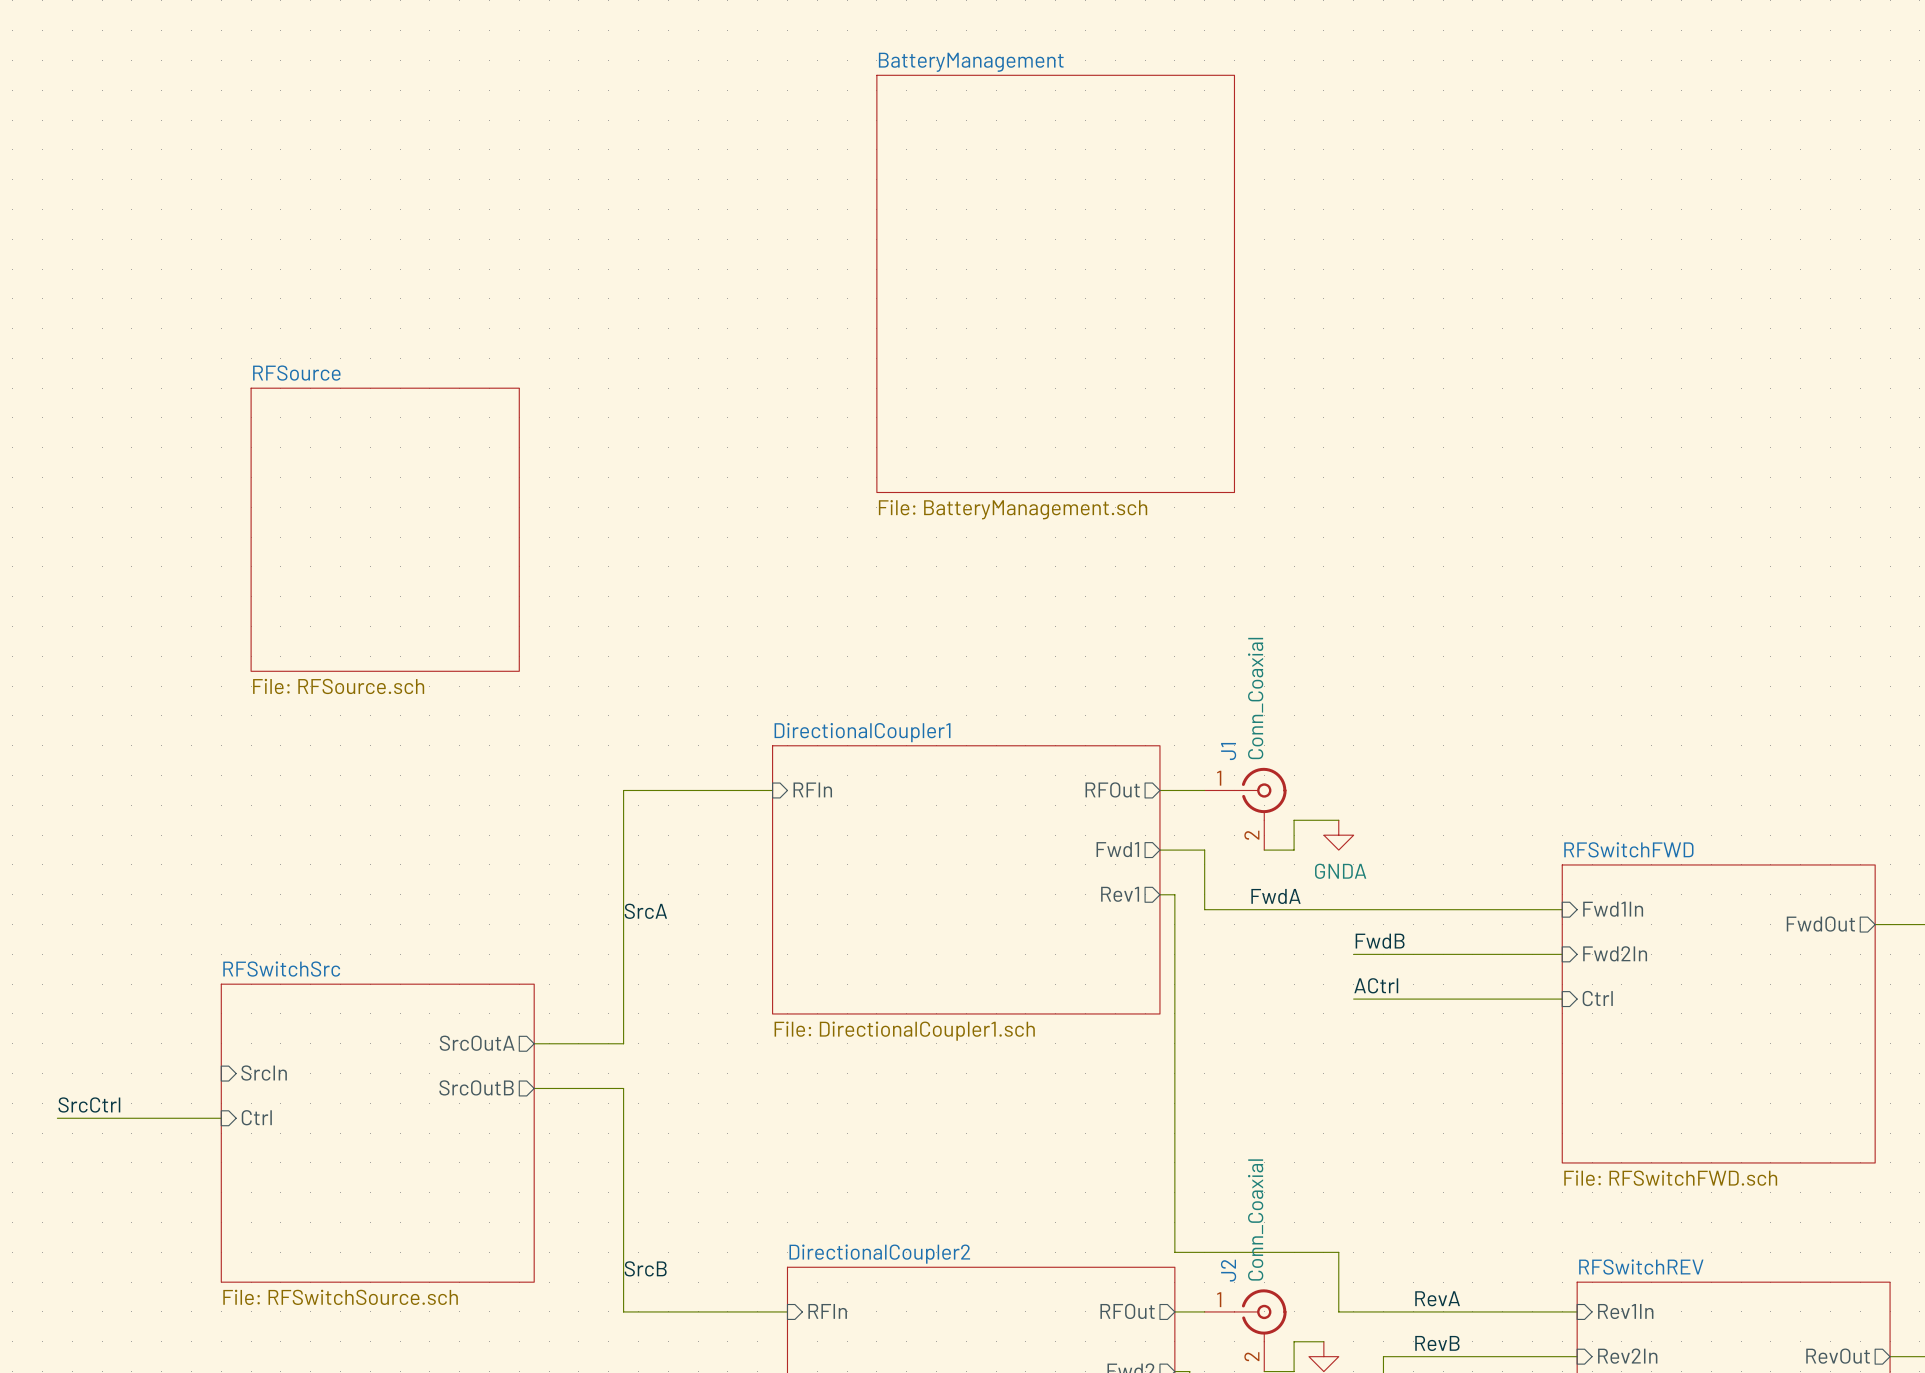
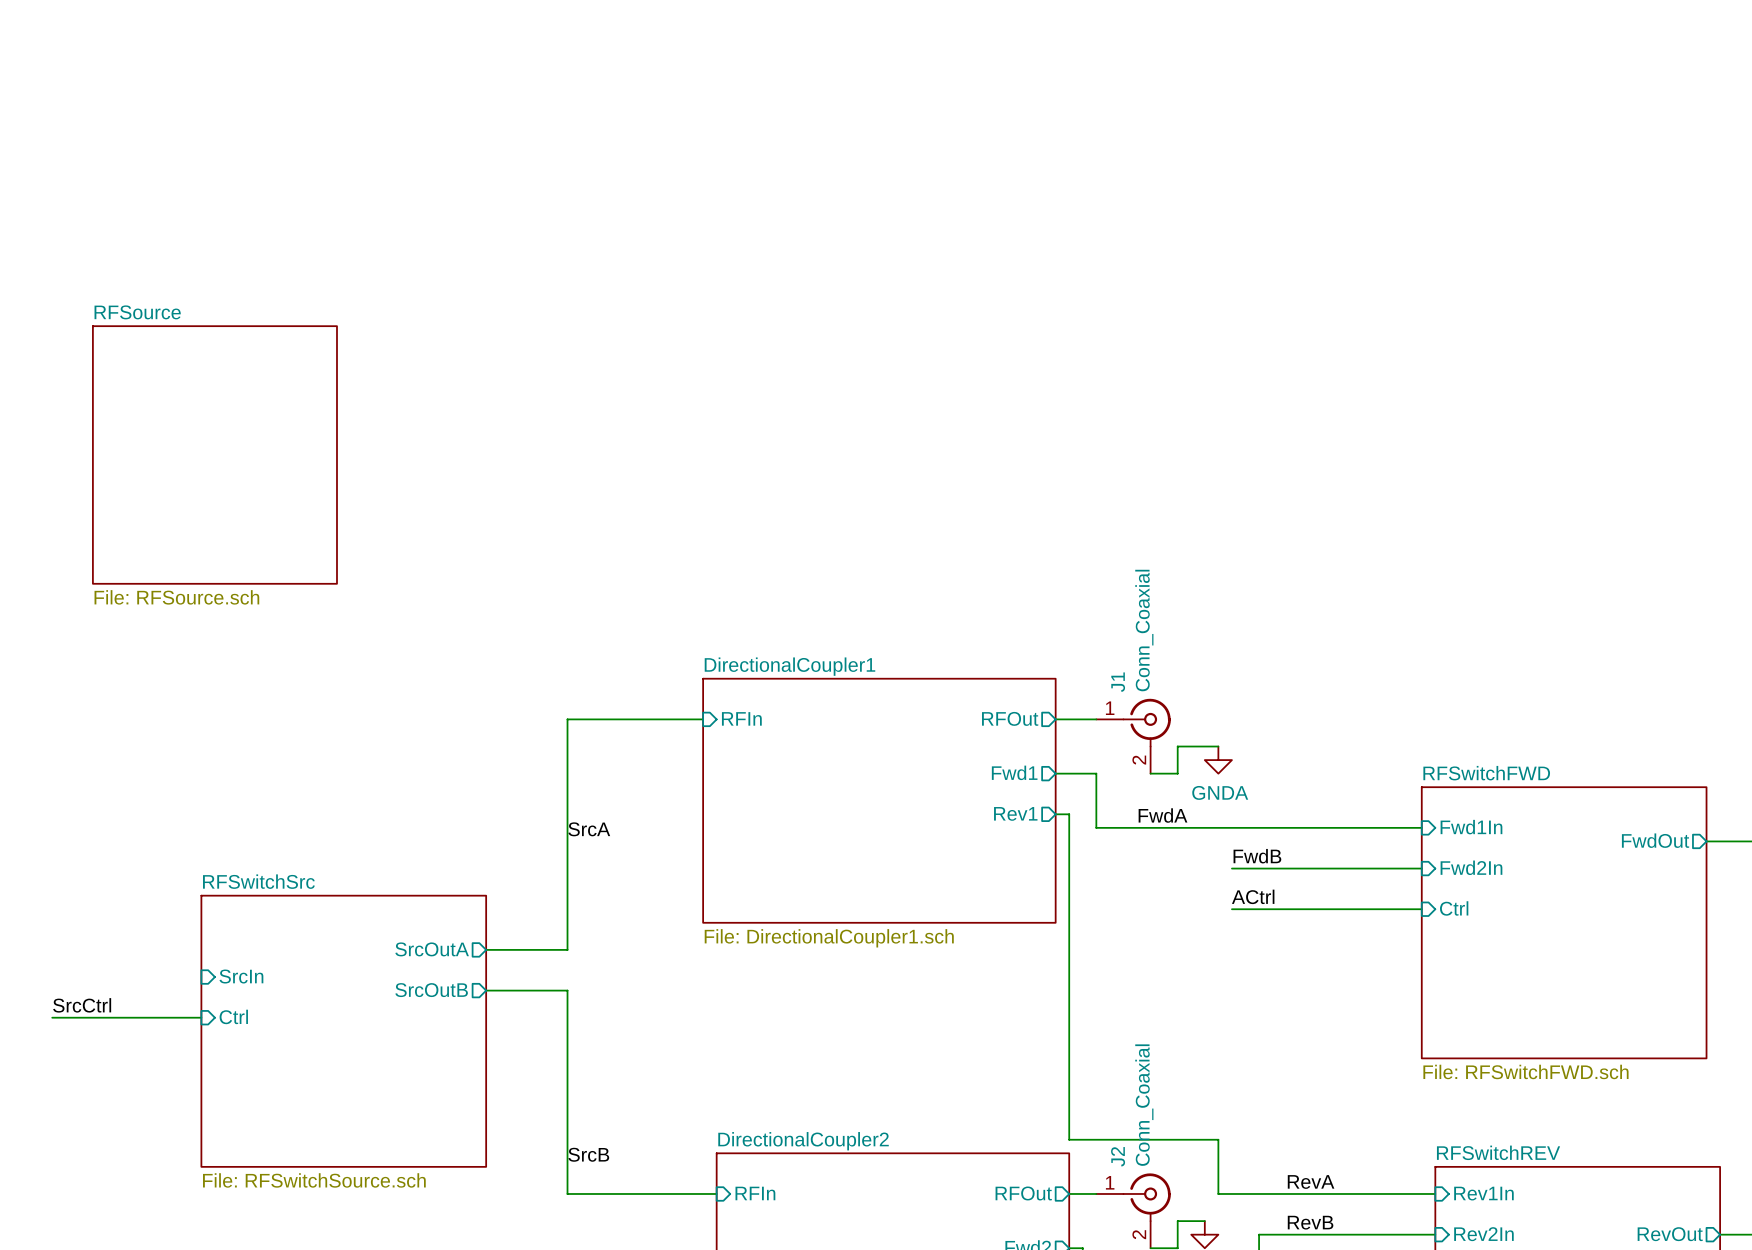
sheet BatteryManagement: File: BatteryManagement.sch (1055, 283) -> none
sheet RFSource position: (385, 529) -> (214, 454)

